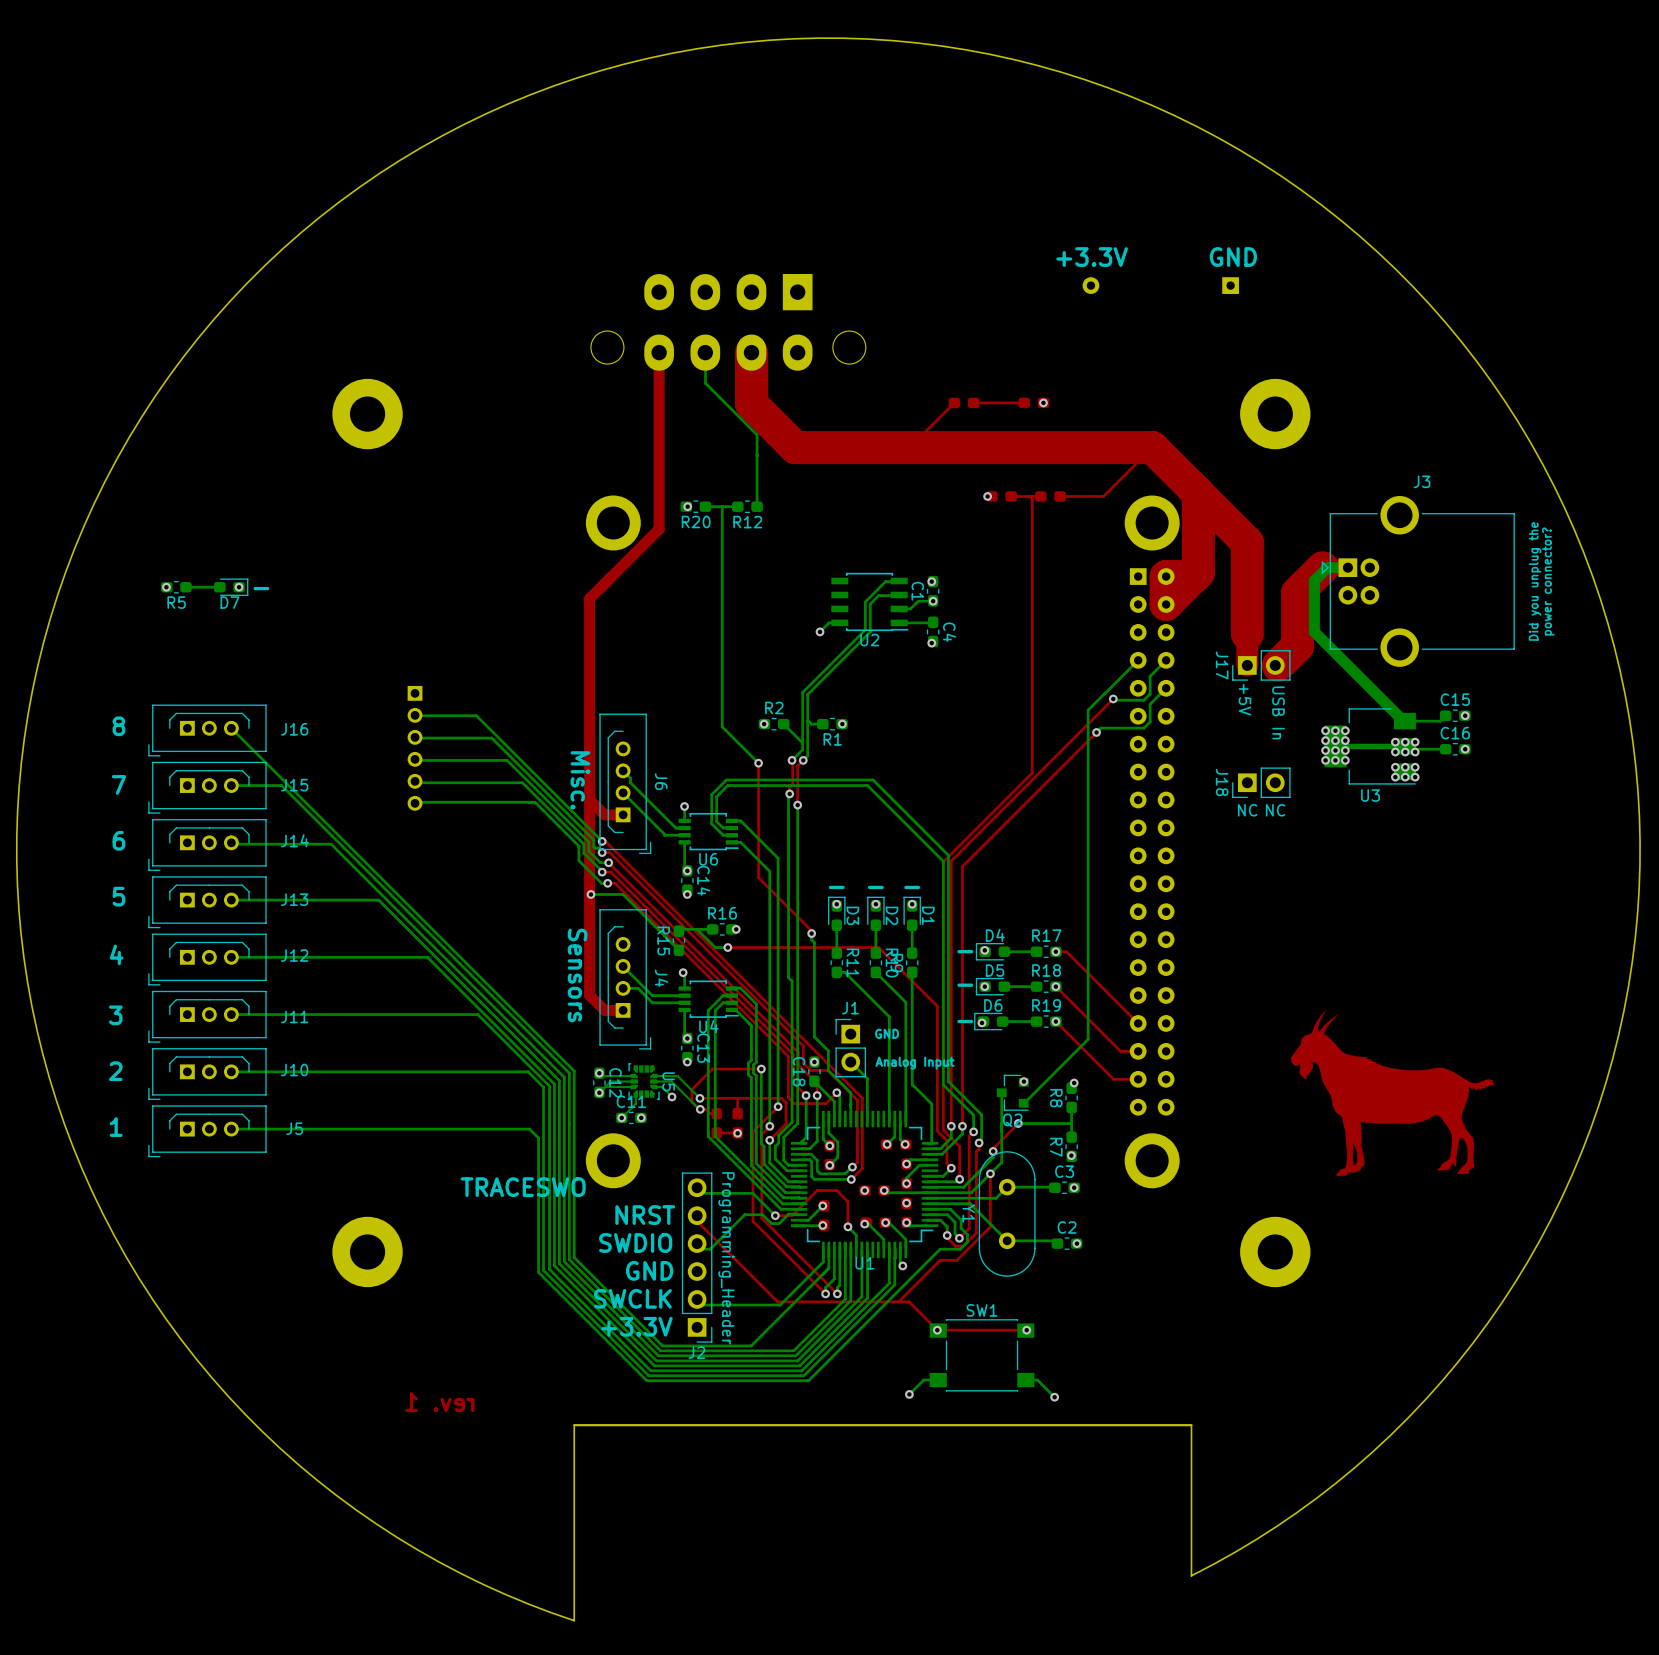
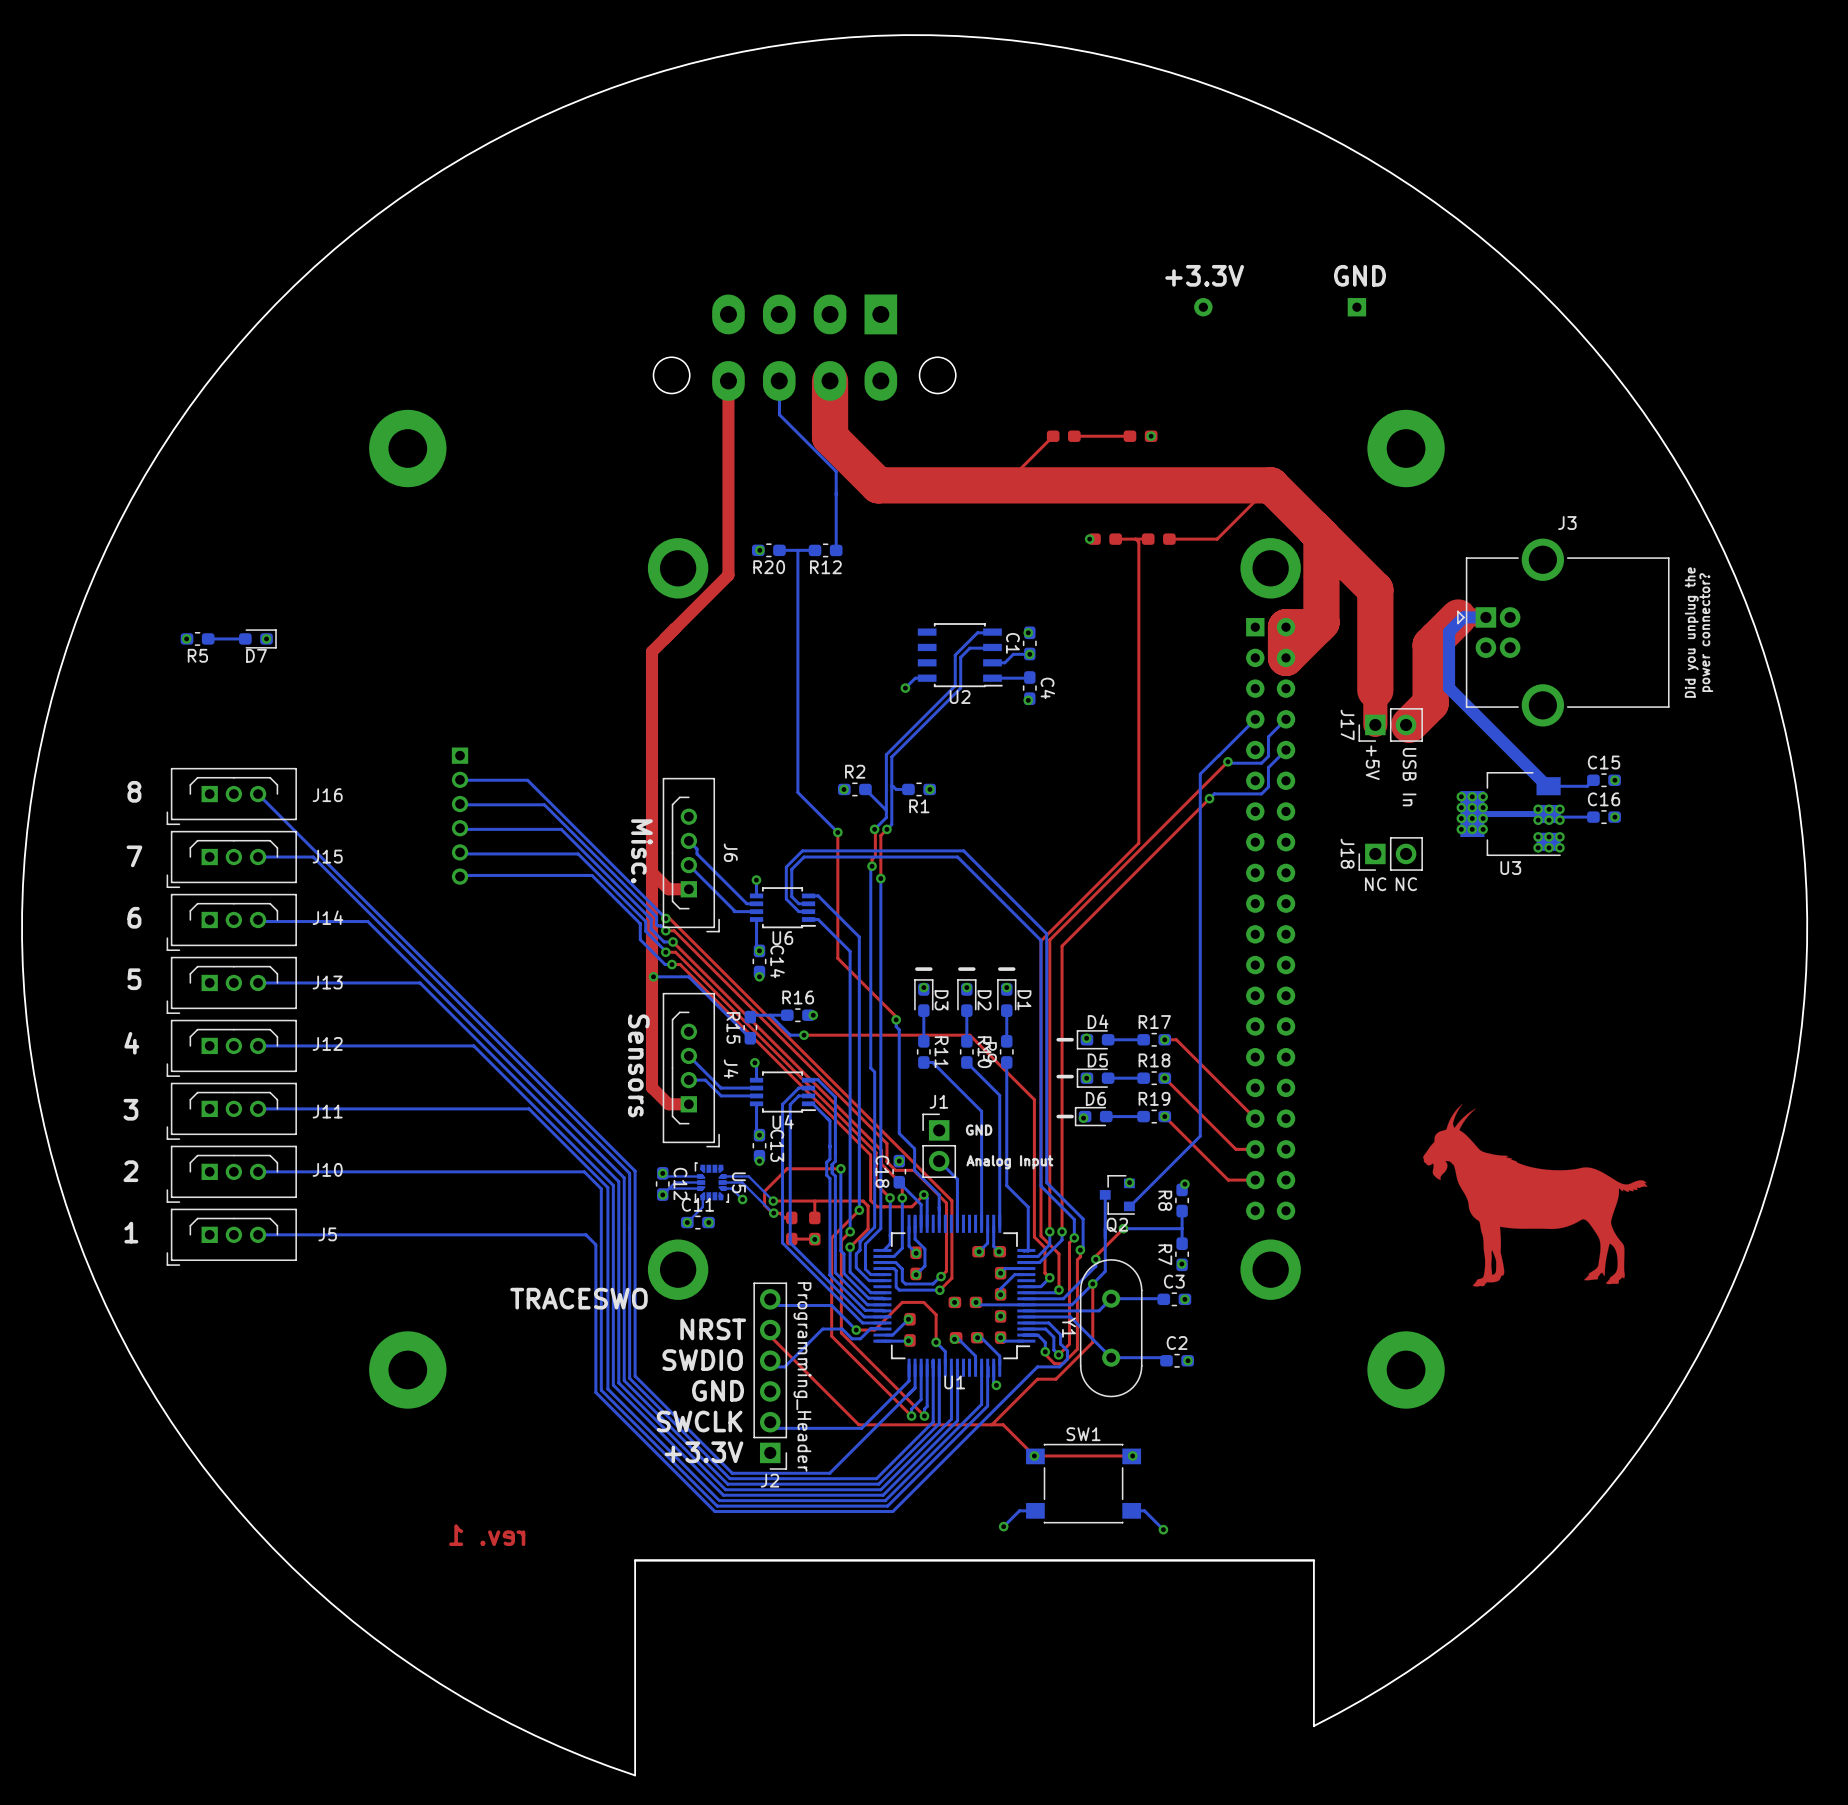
text: - (261, 588) -> none

